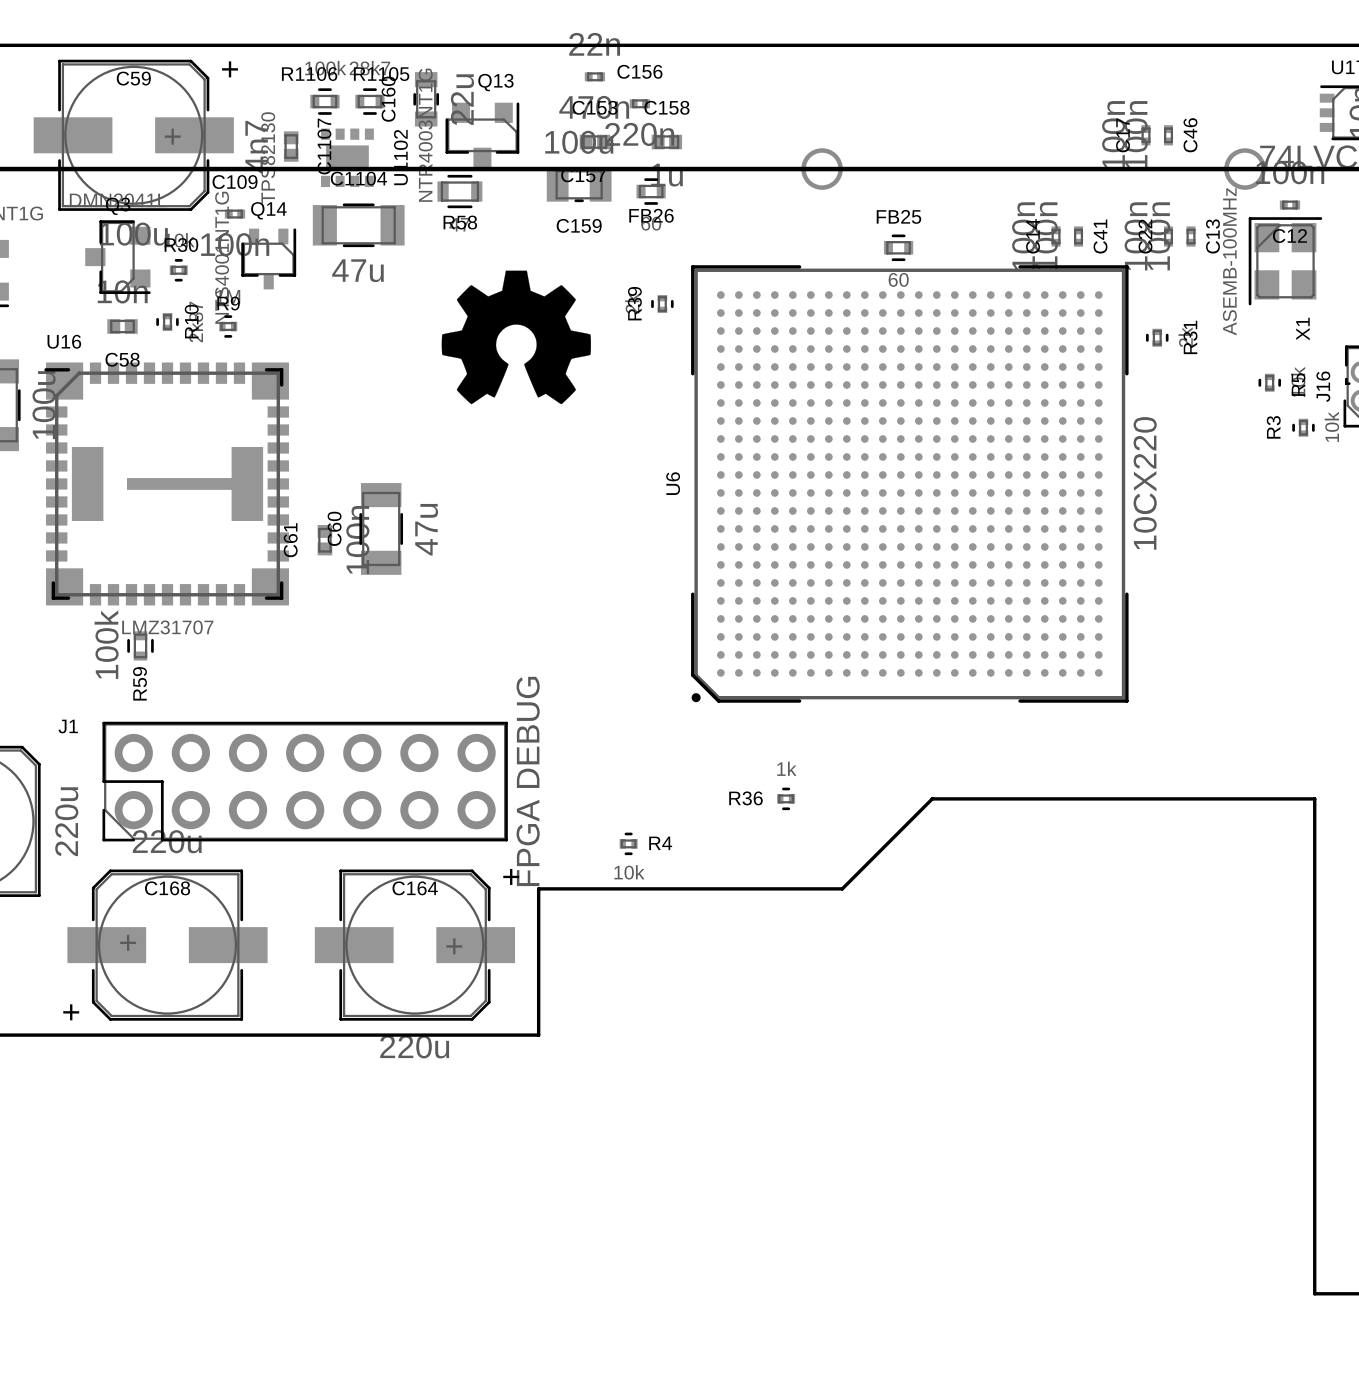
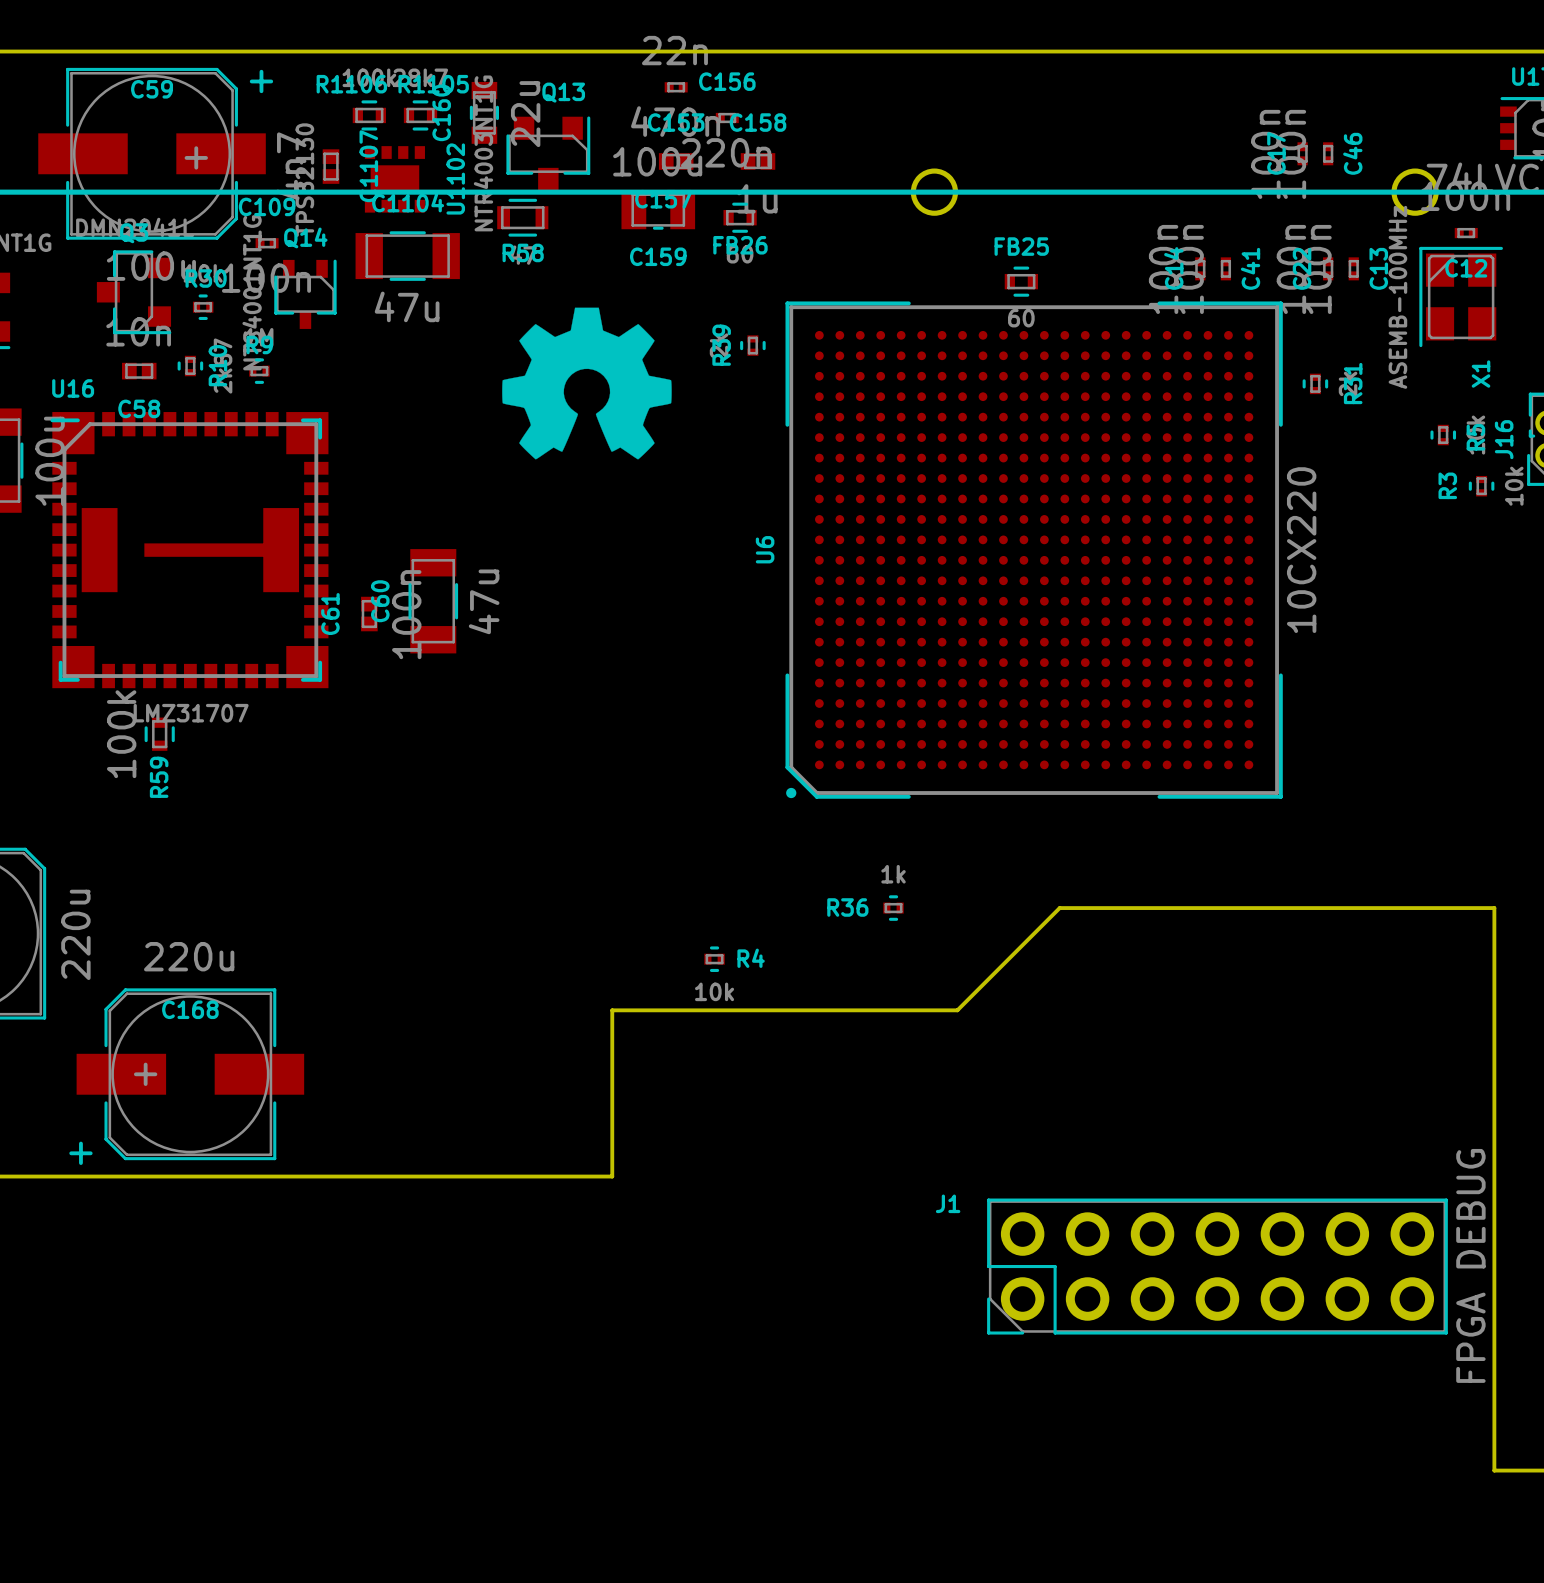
J1 position: (305, 781) -> (1217, 1266)
C164: 220u (414, 945) -> none

